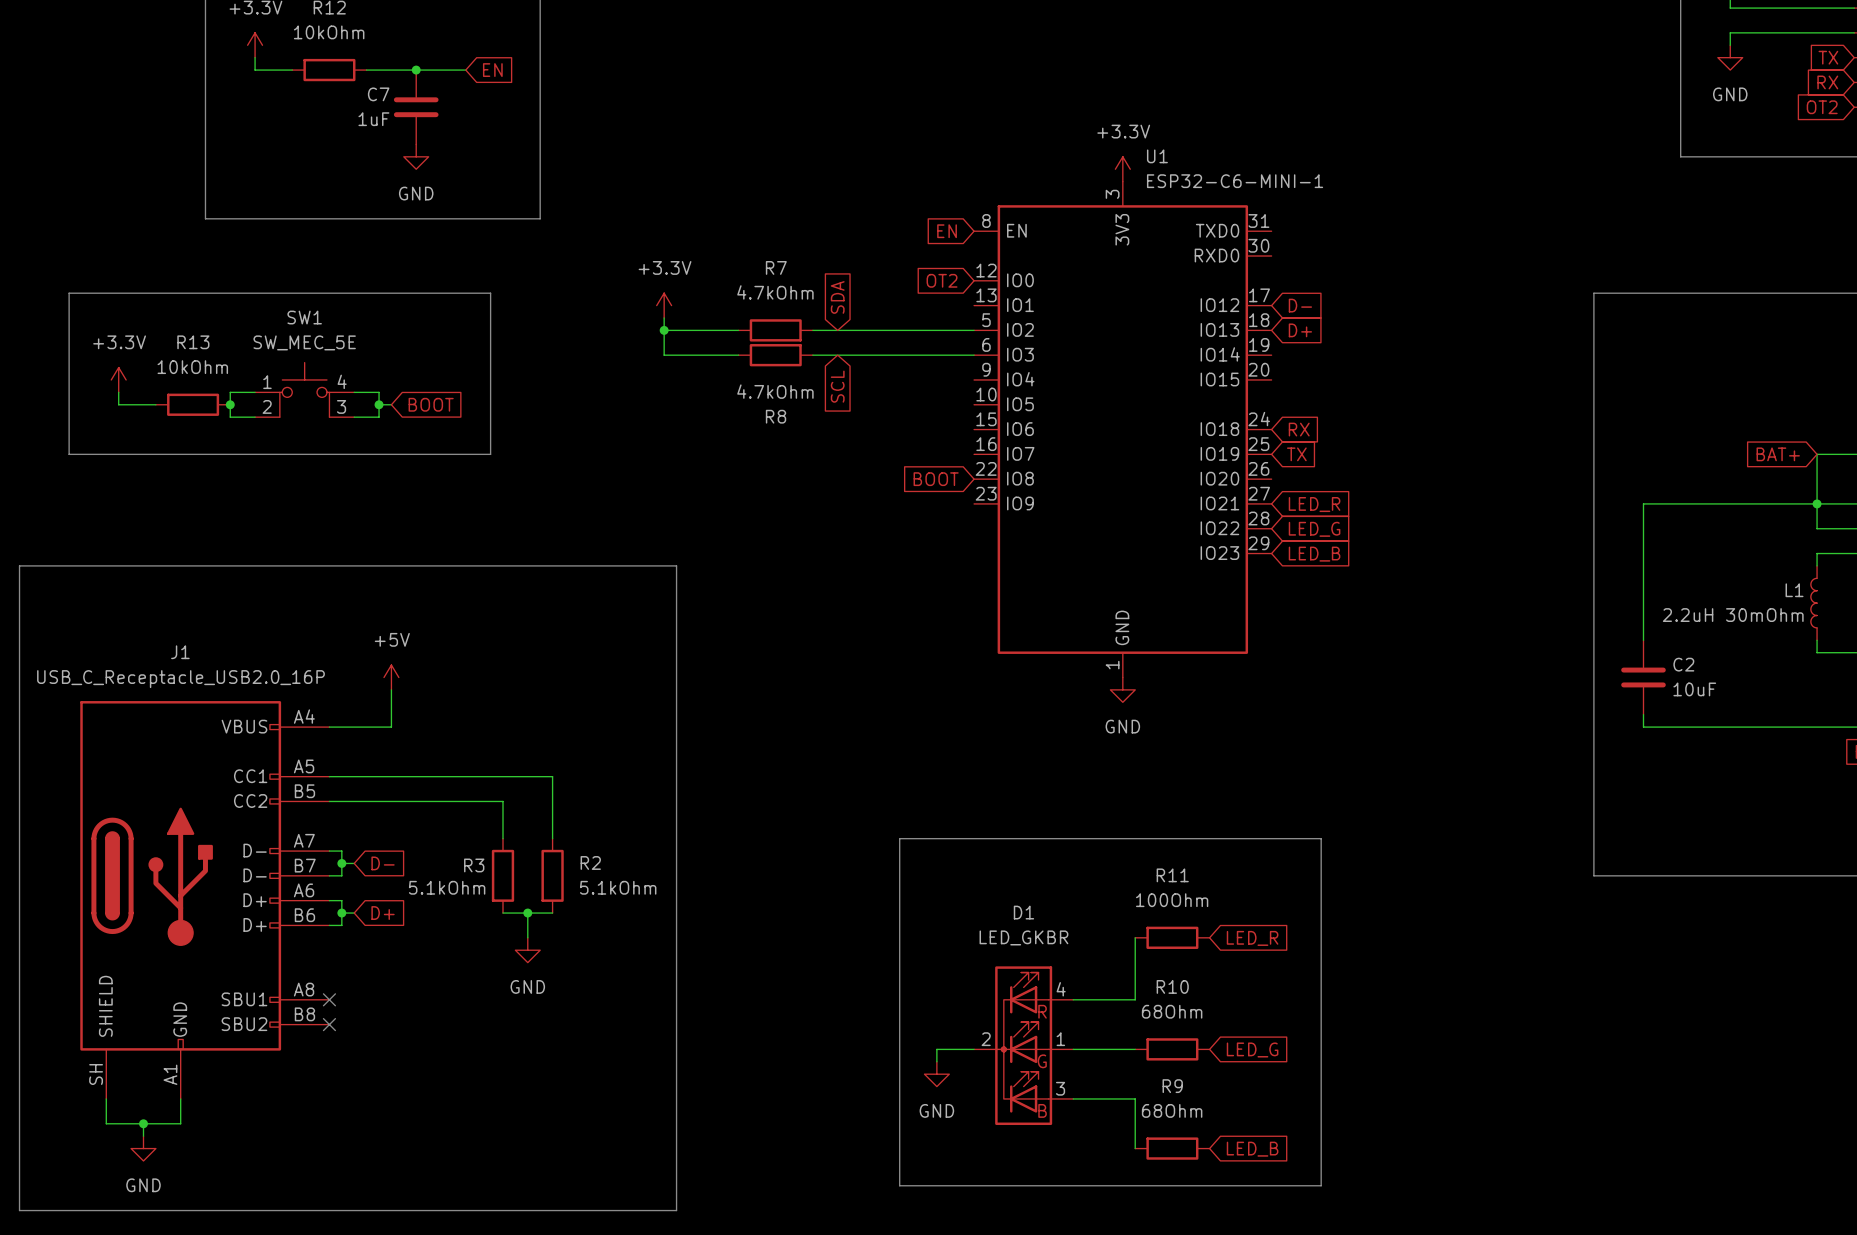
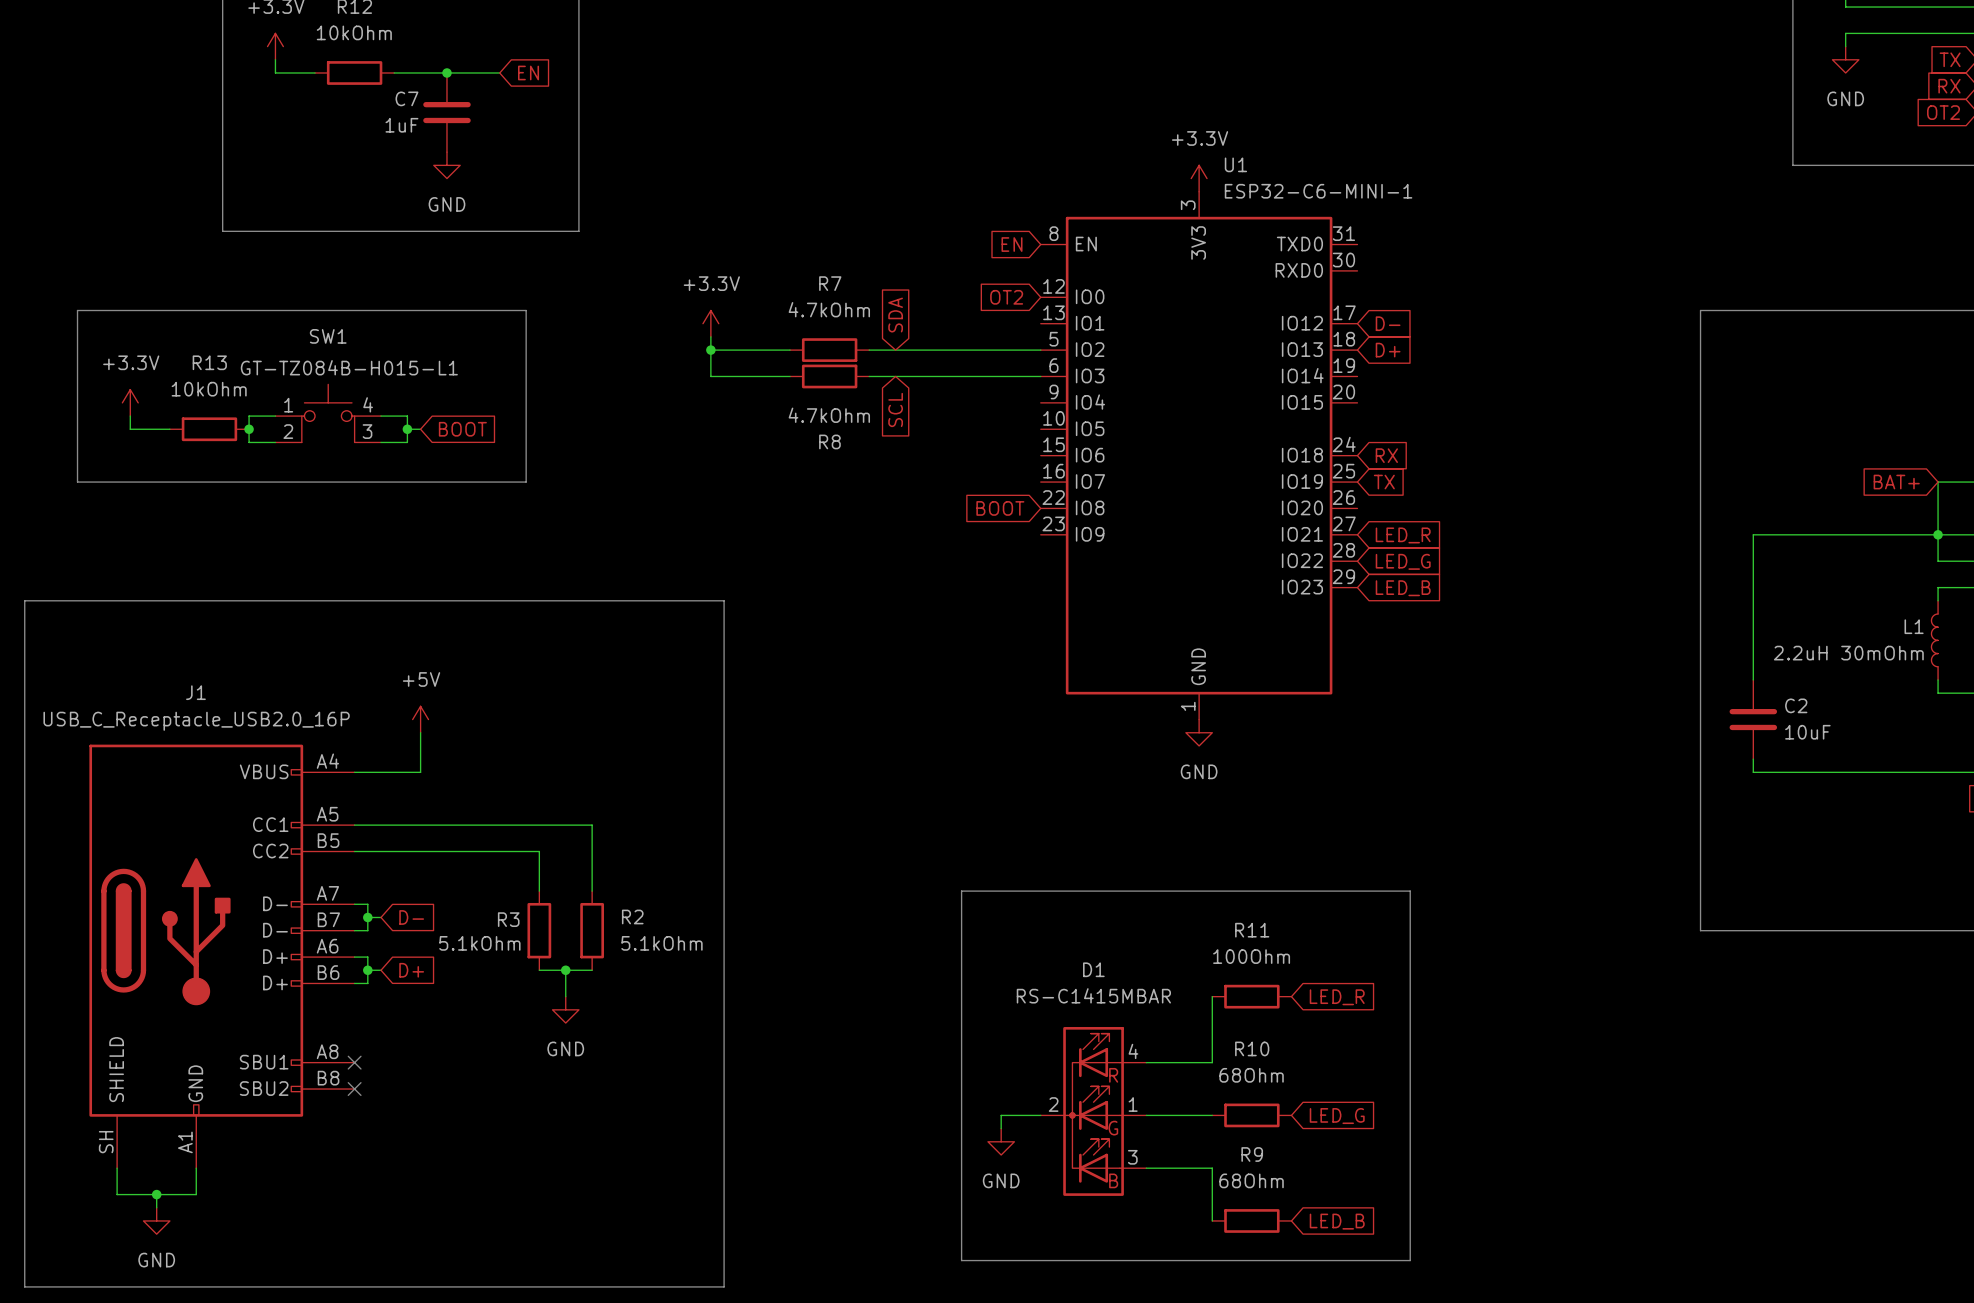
SW1 value: SW_MEC_5E (304, 342) -> GT-TZ084B-H015-L1 (349, 367)
D1 value: LED_GKBR (1023, 937) -> RS-C1415MBAR (1093, 995)

